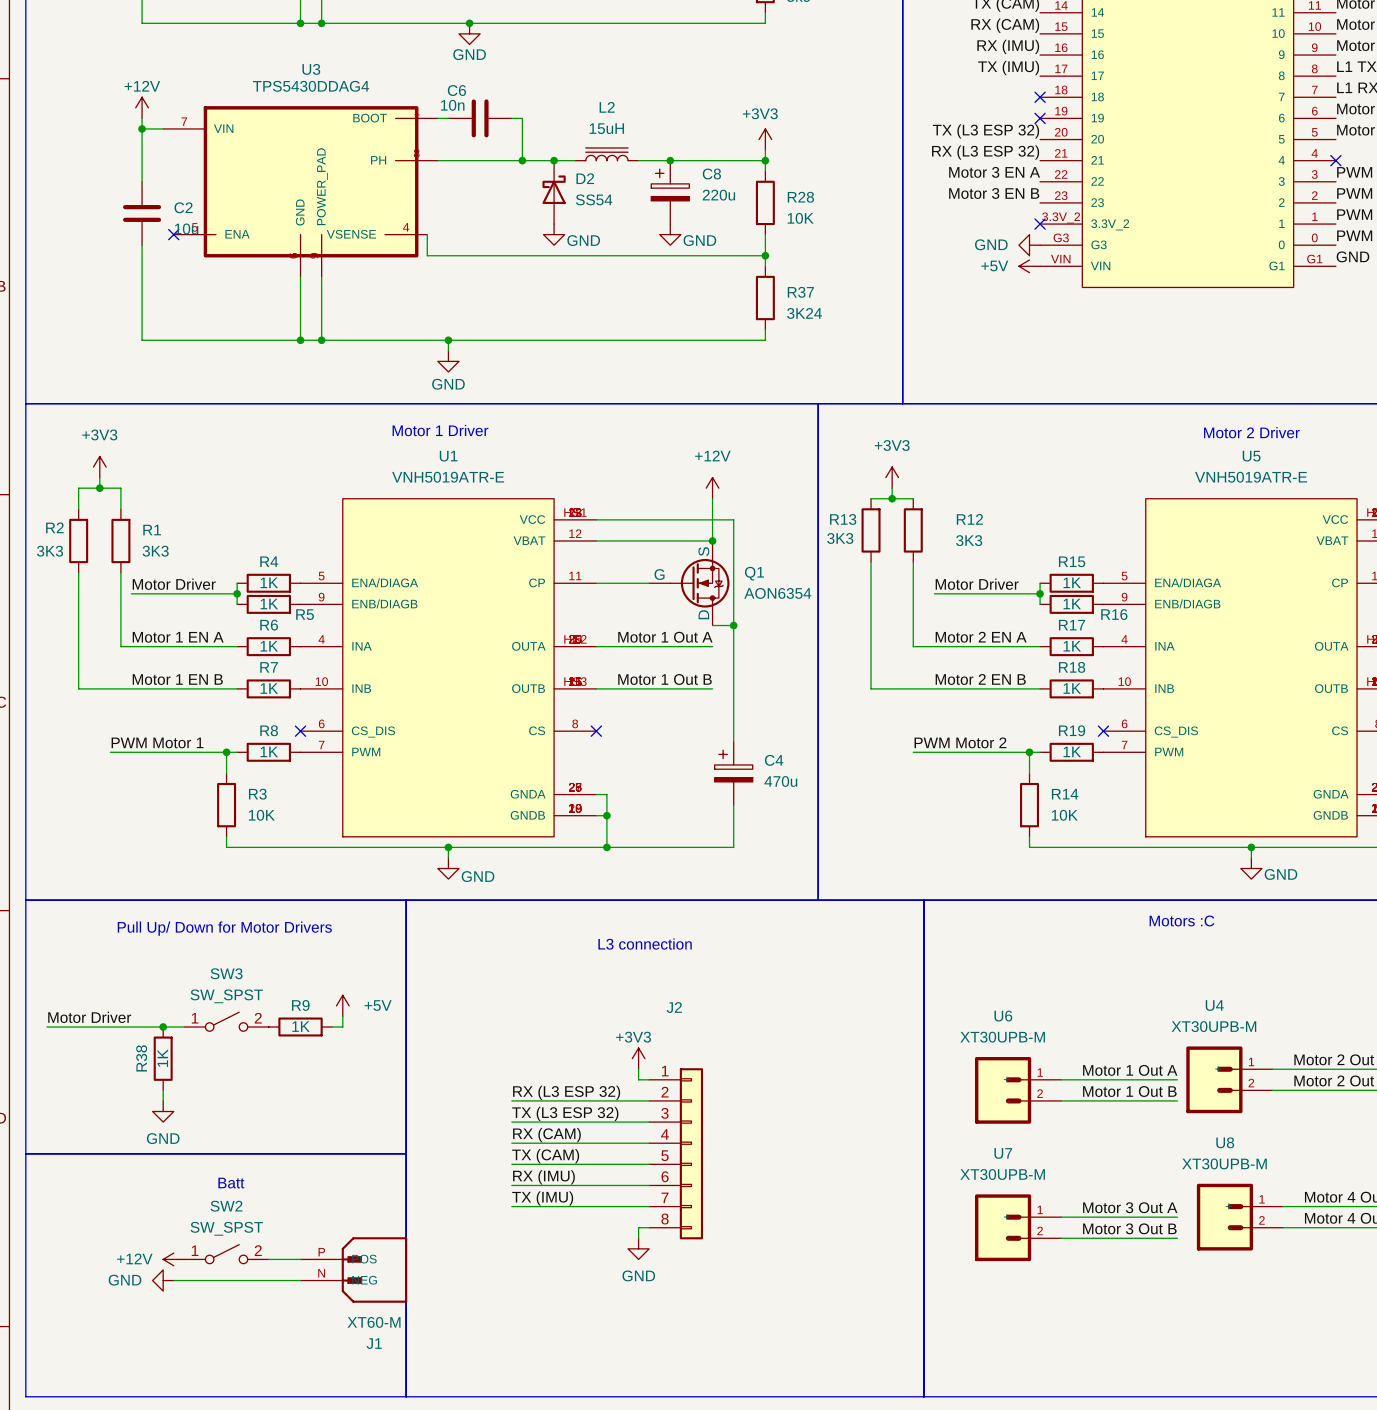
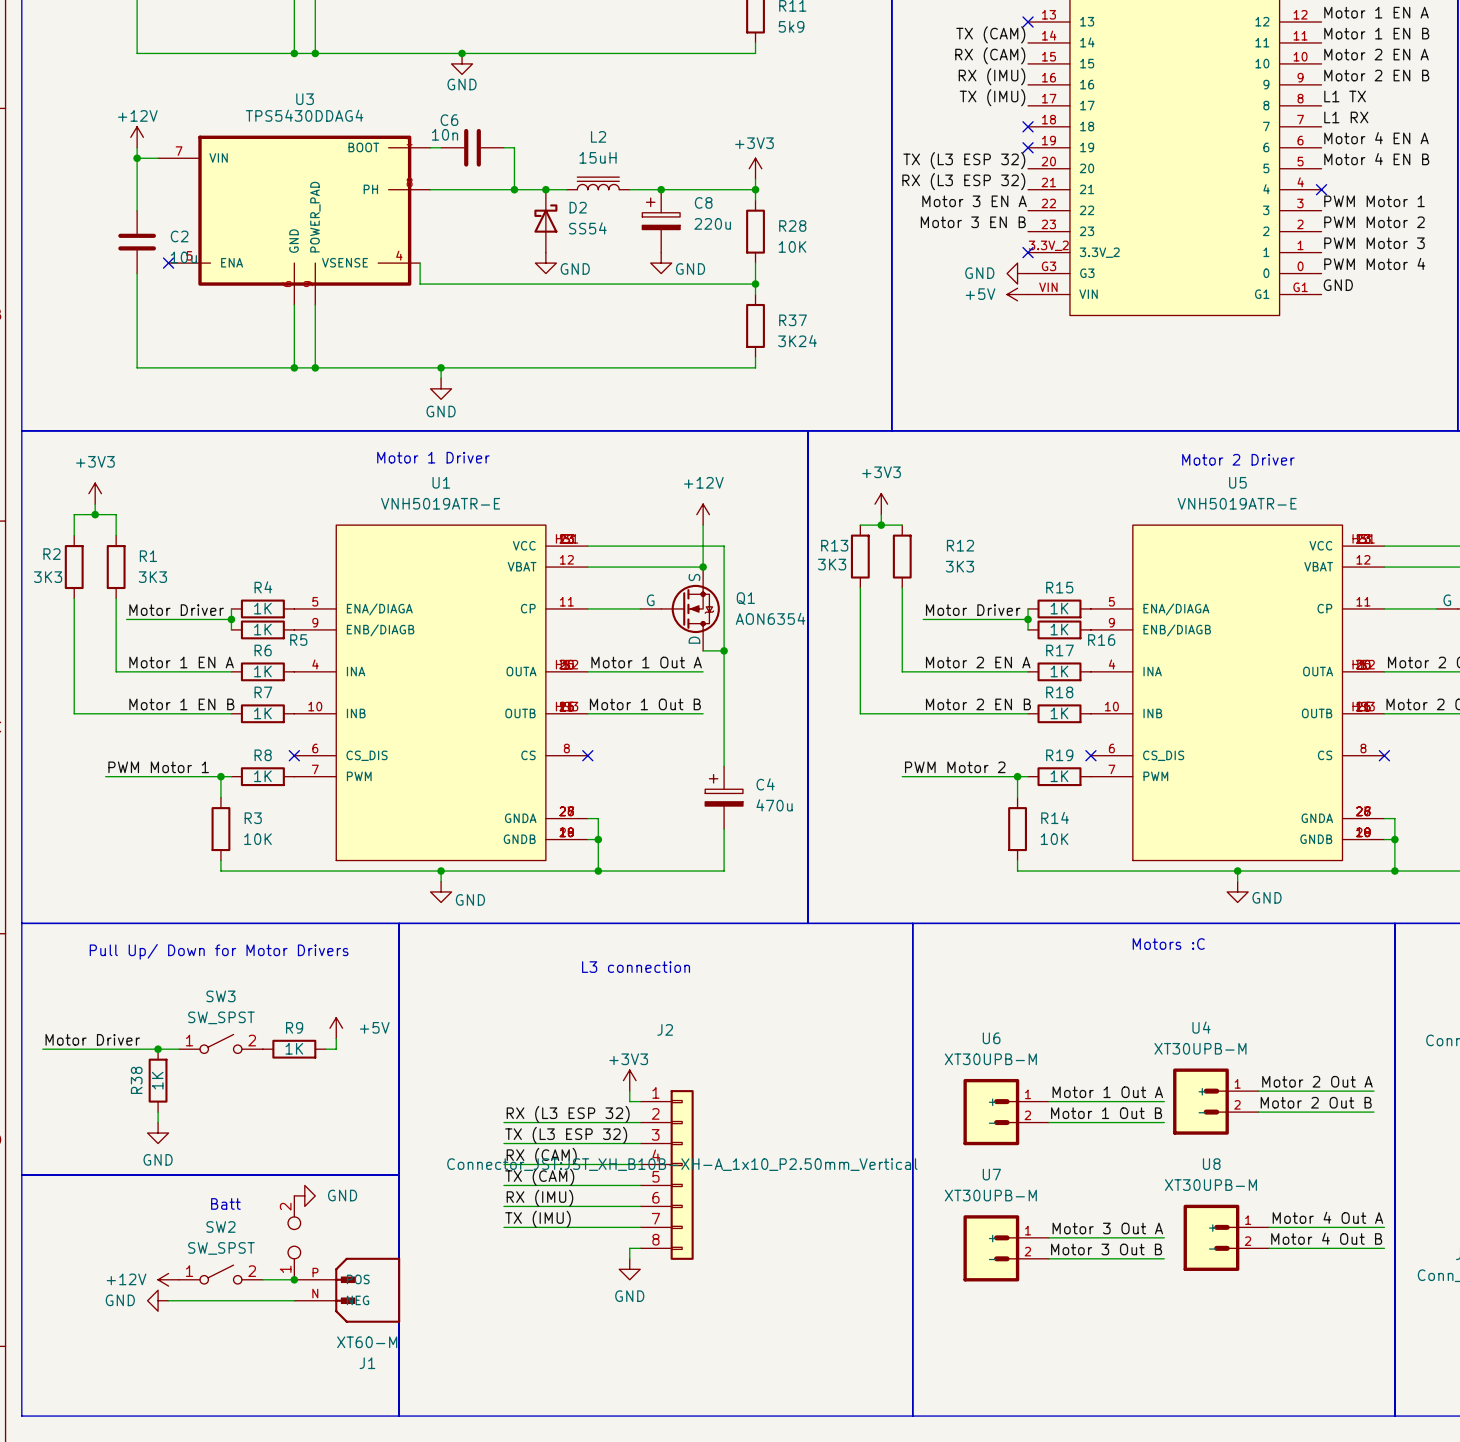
J2 text: none -> Connector_JST:JST_XH_B10B-XH-A_1x10_P2.50mm_Vertical (682, 1164)
power symbol: none -> GND (304, 1195)
part: none -> (294, 1237)
junction: none -> (294, 1279)

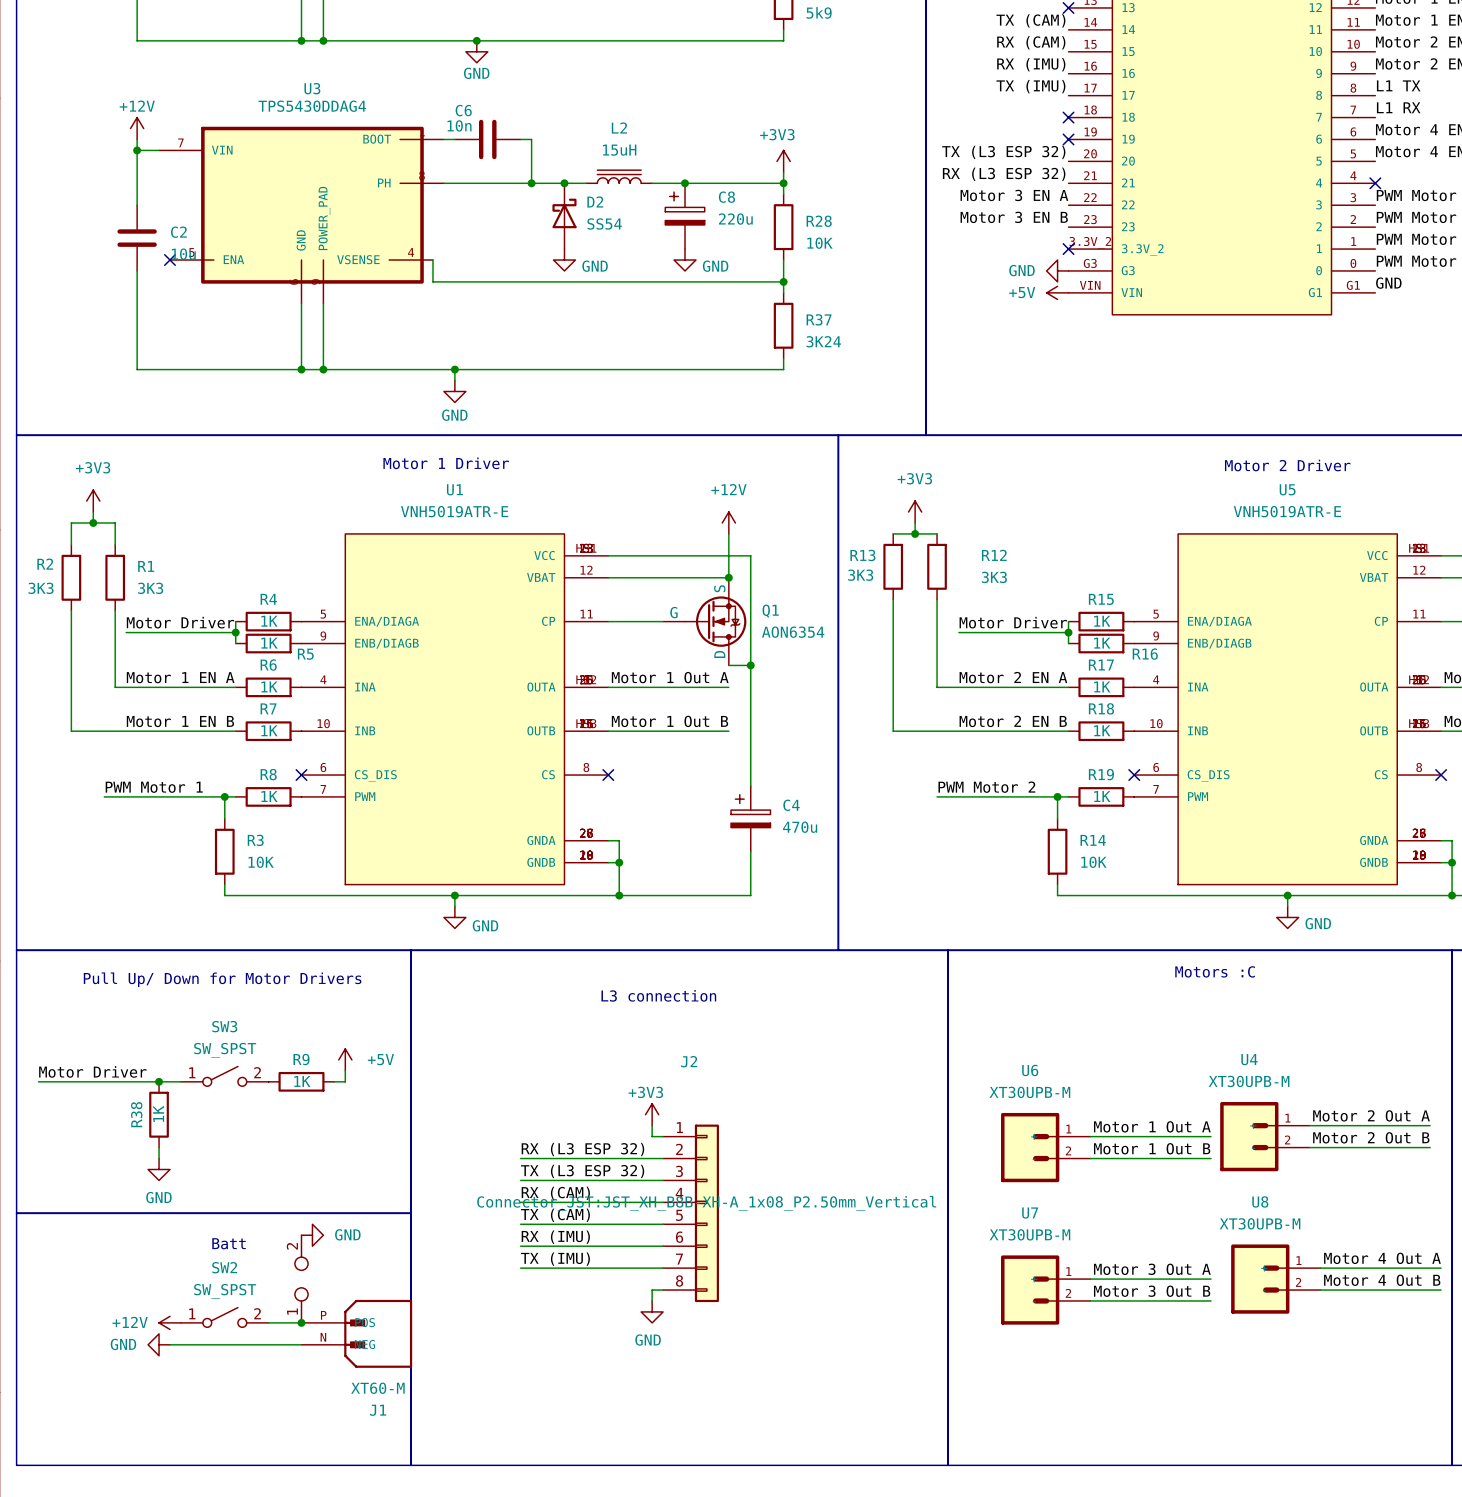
J2 text: Connector_JST:JST_XH_B10B-XH-A_1x10_P2.50mm_Vertical (682, 1164) -> Connector_JST:JST_XH_B8B-XH-A_1x08_P2.50mm_Vertical (706, 1203)

